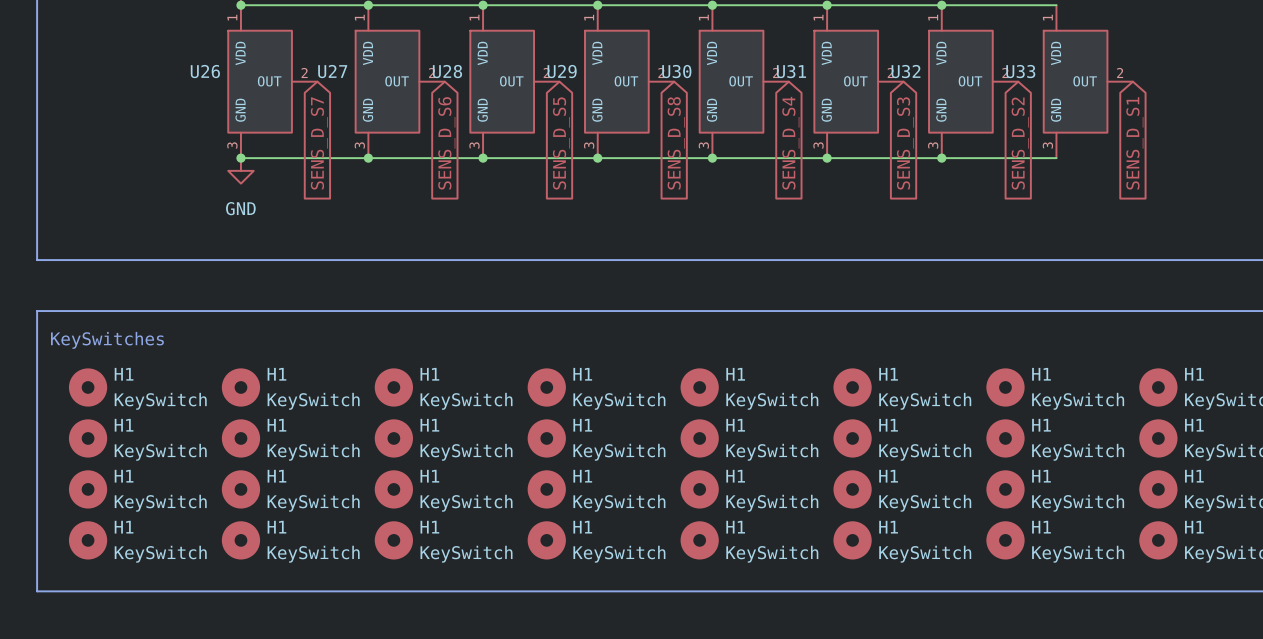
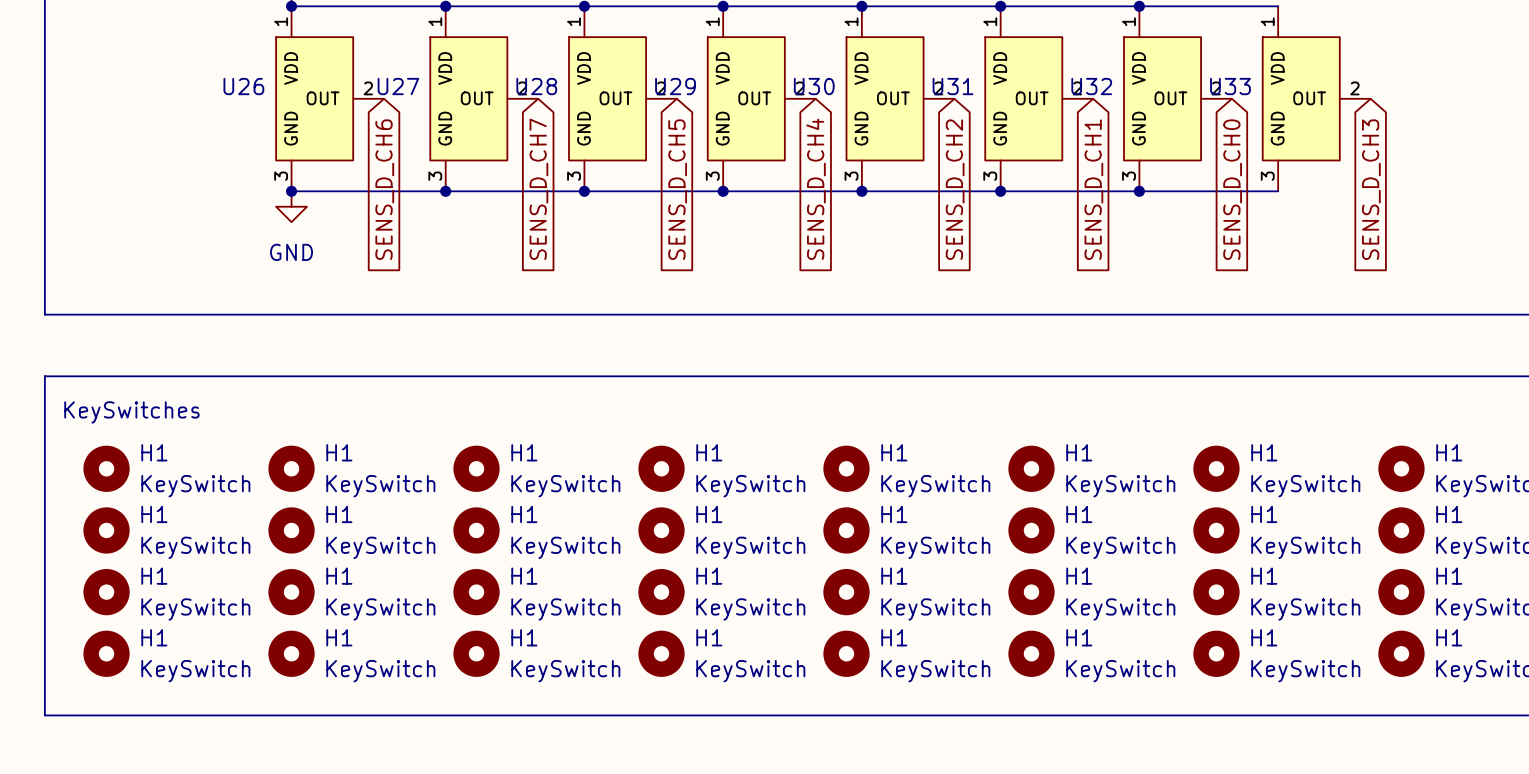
global label: SENS_D_S7 (319, 143) -> SENS_D_CH6 (384, 189)
global label: SENS_D_S6 (446, 143) -> SENS_D_CH7 (538, 189)
global label: SENS_D_S5 (561, 143) -> SENS_D_CH5 (677, 189)
global label: SENS_D_S8 (676, 143) -> SENS_D_CH4 (816, 189)
global label: SENS_D_S4 (790, 143) -> SENS_D_CH2 (955, 189)
global label: SENS_D_S3 (905, 143) -> SENS_D_CH1 (1093, 189)
global label: SENS_D_S2 (1020, 143) -> SENS_D_CH0 (1232, 189)
global label: SENS_D_S1 (1134, 143) -> SENS_D_CH3 (1371, 189)

